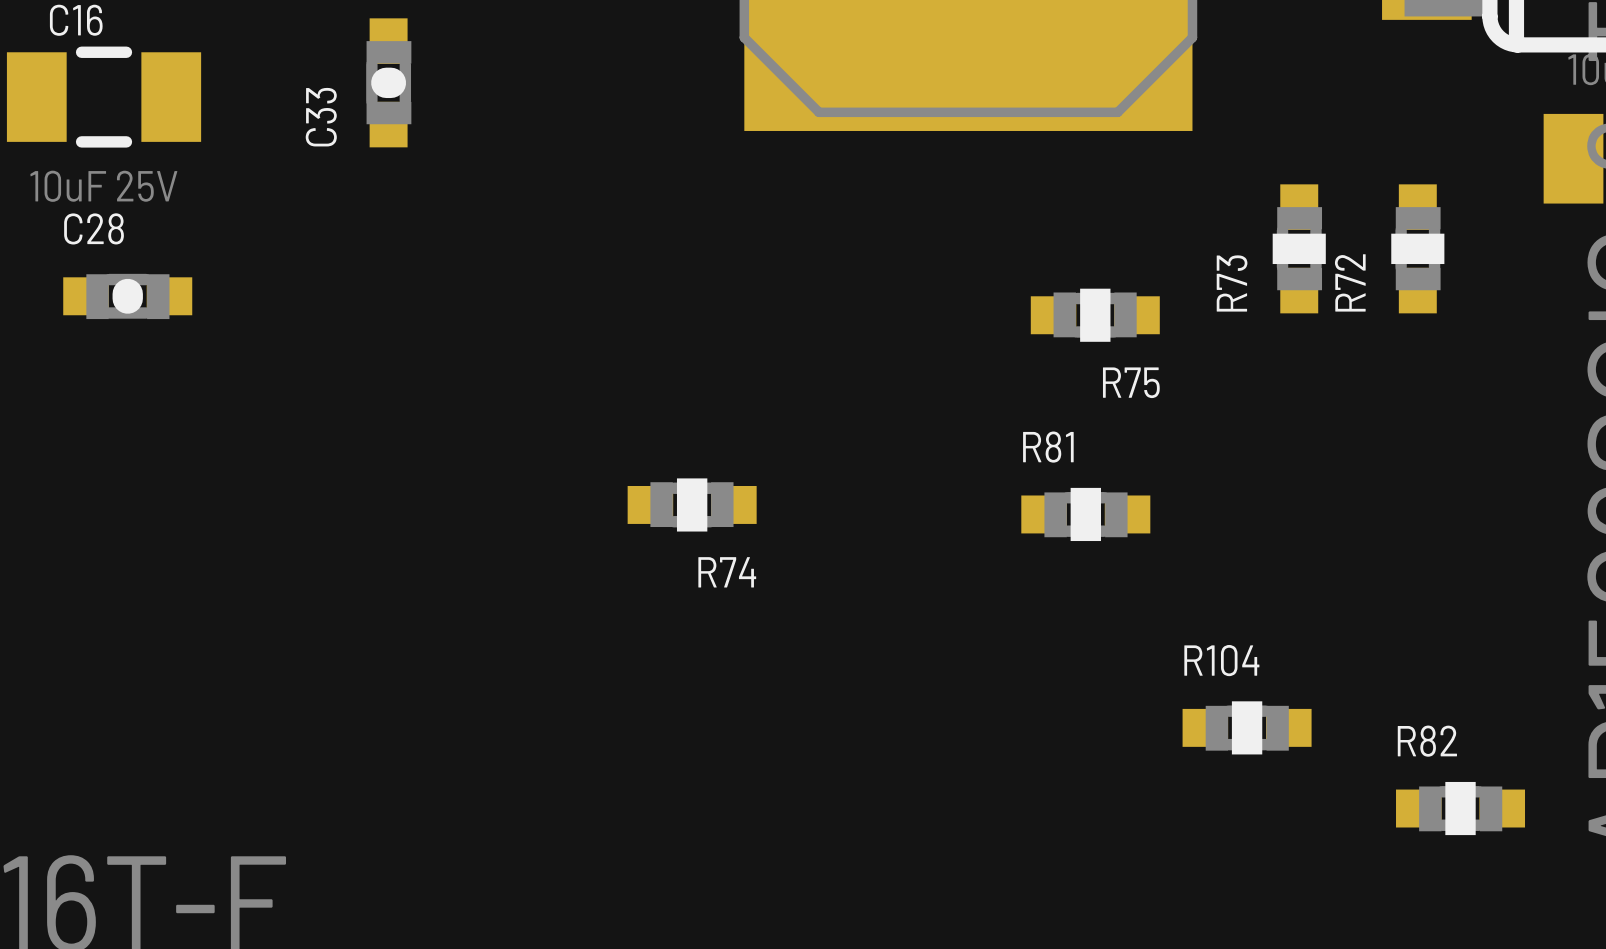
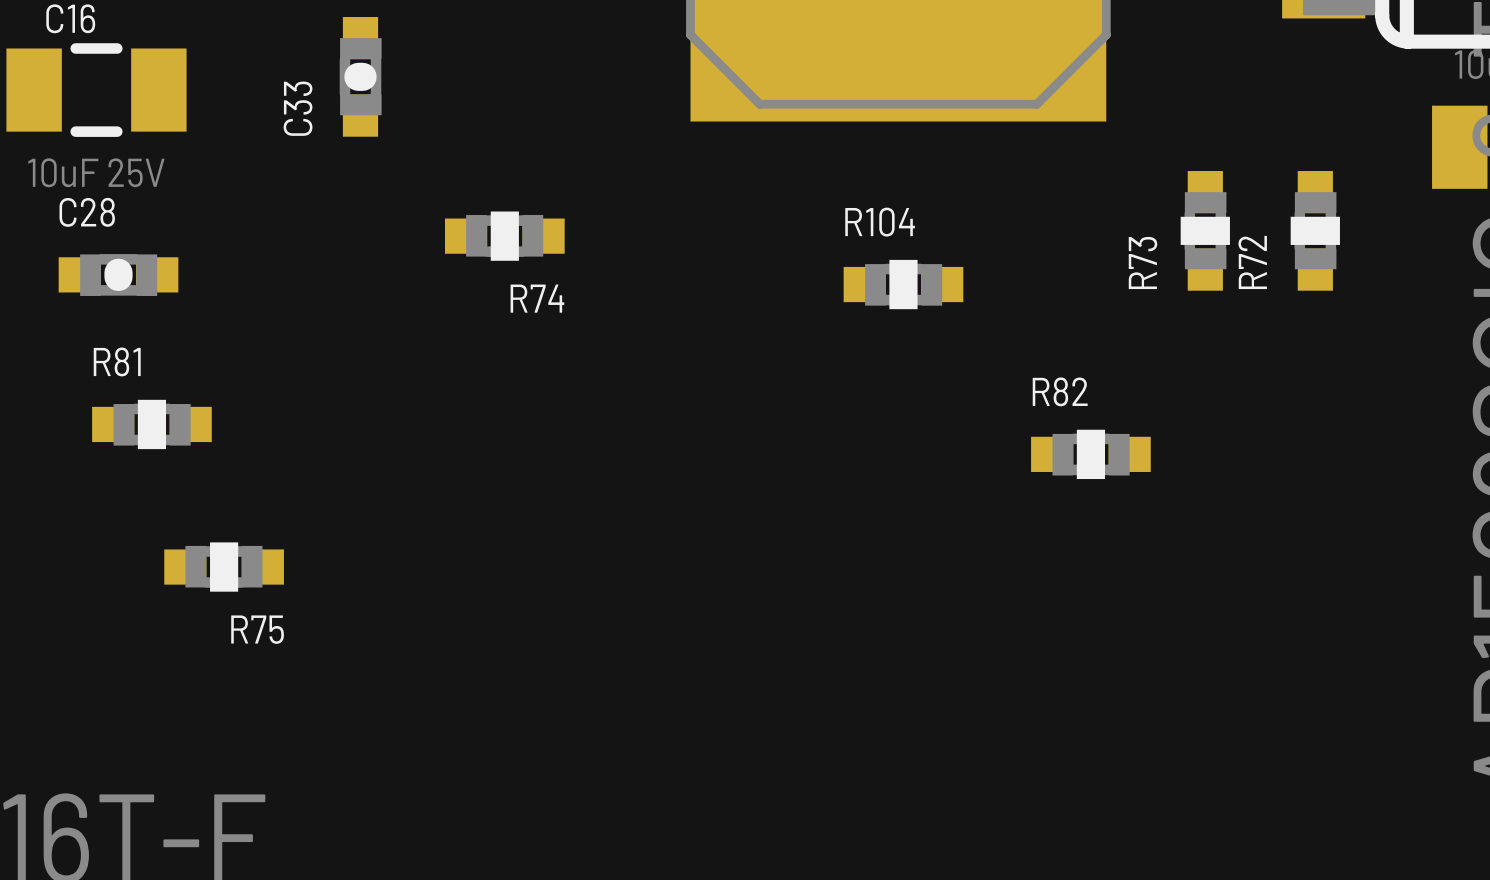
R75 position: (1095, 315) -> (224, 567)
R74 position: (692, 504) -> (504, 236)
R81 position: (1085, 514) -> (151, 424)
R104 position: (1247, 727) -> (903, 284)
R82 position: (1460, 808) -> (1090, 454)

